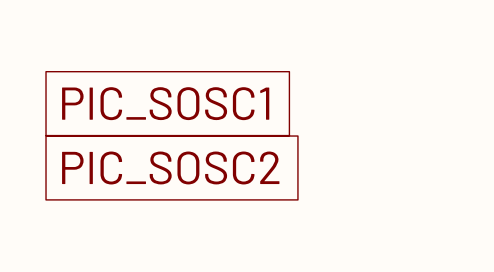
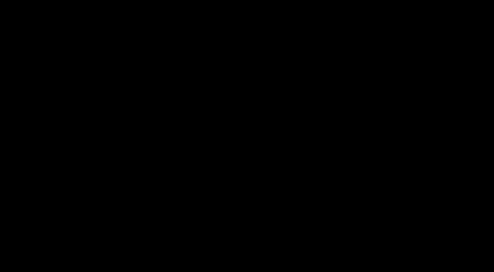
global label: PIC_SOSC1 (165, 103) -> none
global label: PIC_SOSC2 (170, 167) -> none

